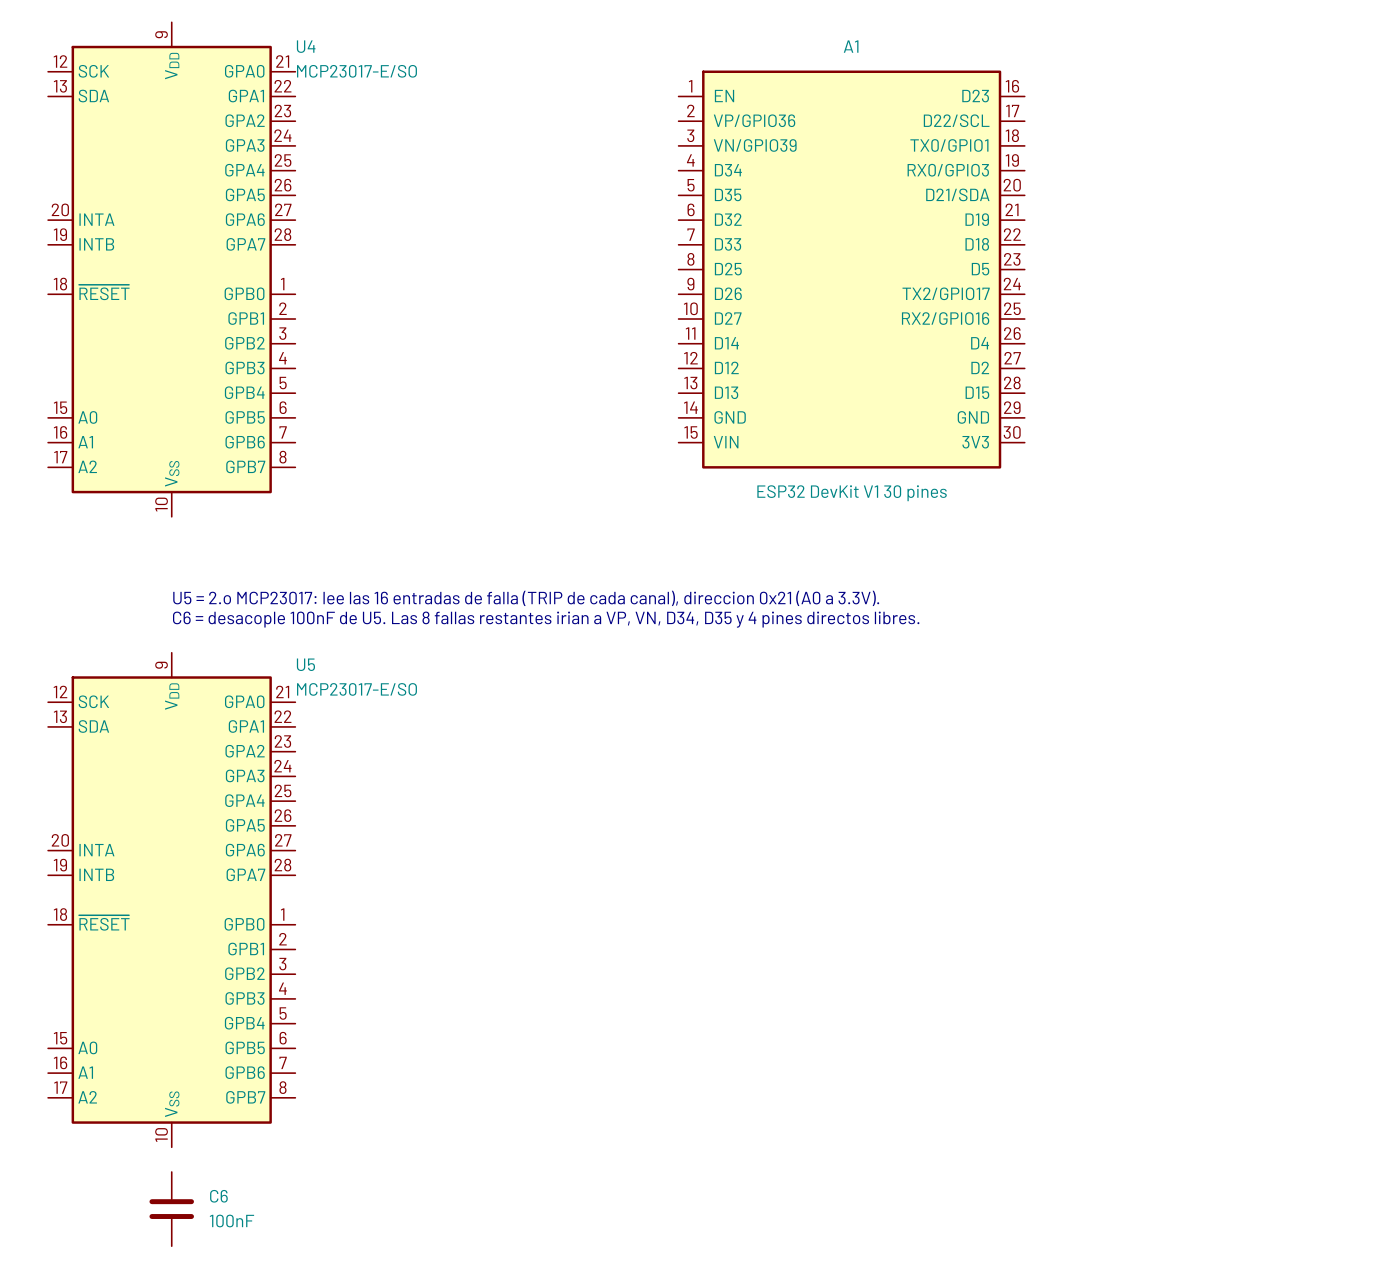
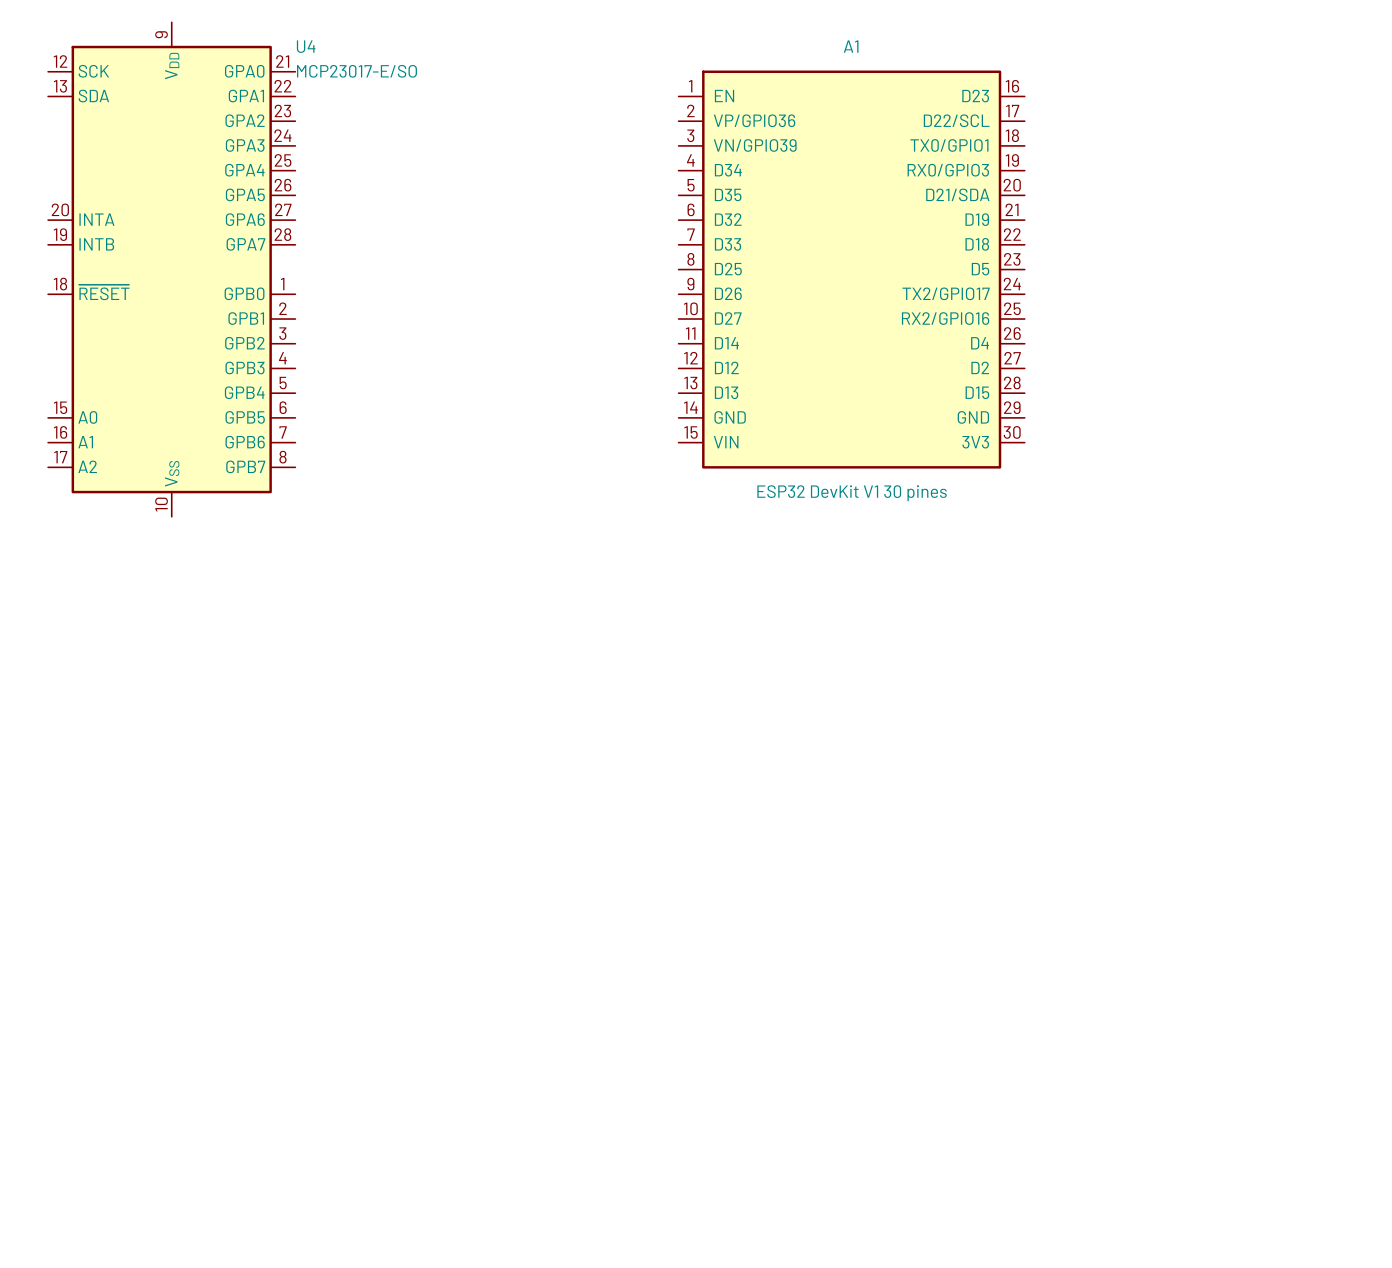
text: U5 = 2.o MCP23017: lee las 16 entradas de falla (TRIP de cada canal), direccion 0x21 (A0 a 3.3V). (526, 598) -> none
text: C6 = desacople 100nF de U5. Las 8 fallas restantes irian a VP, VN, D34, D35 y 4 pines directos libres. (546, 619) -> none
U5: MCP23017-E/SO (171, 900) -> none
C6: 100nF (171, 1209) -> none

